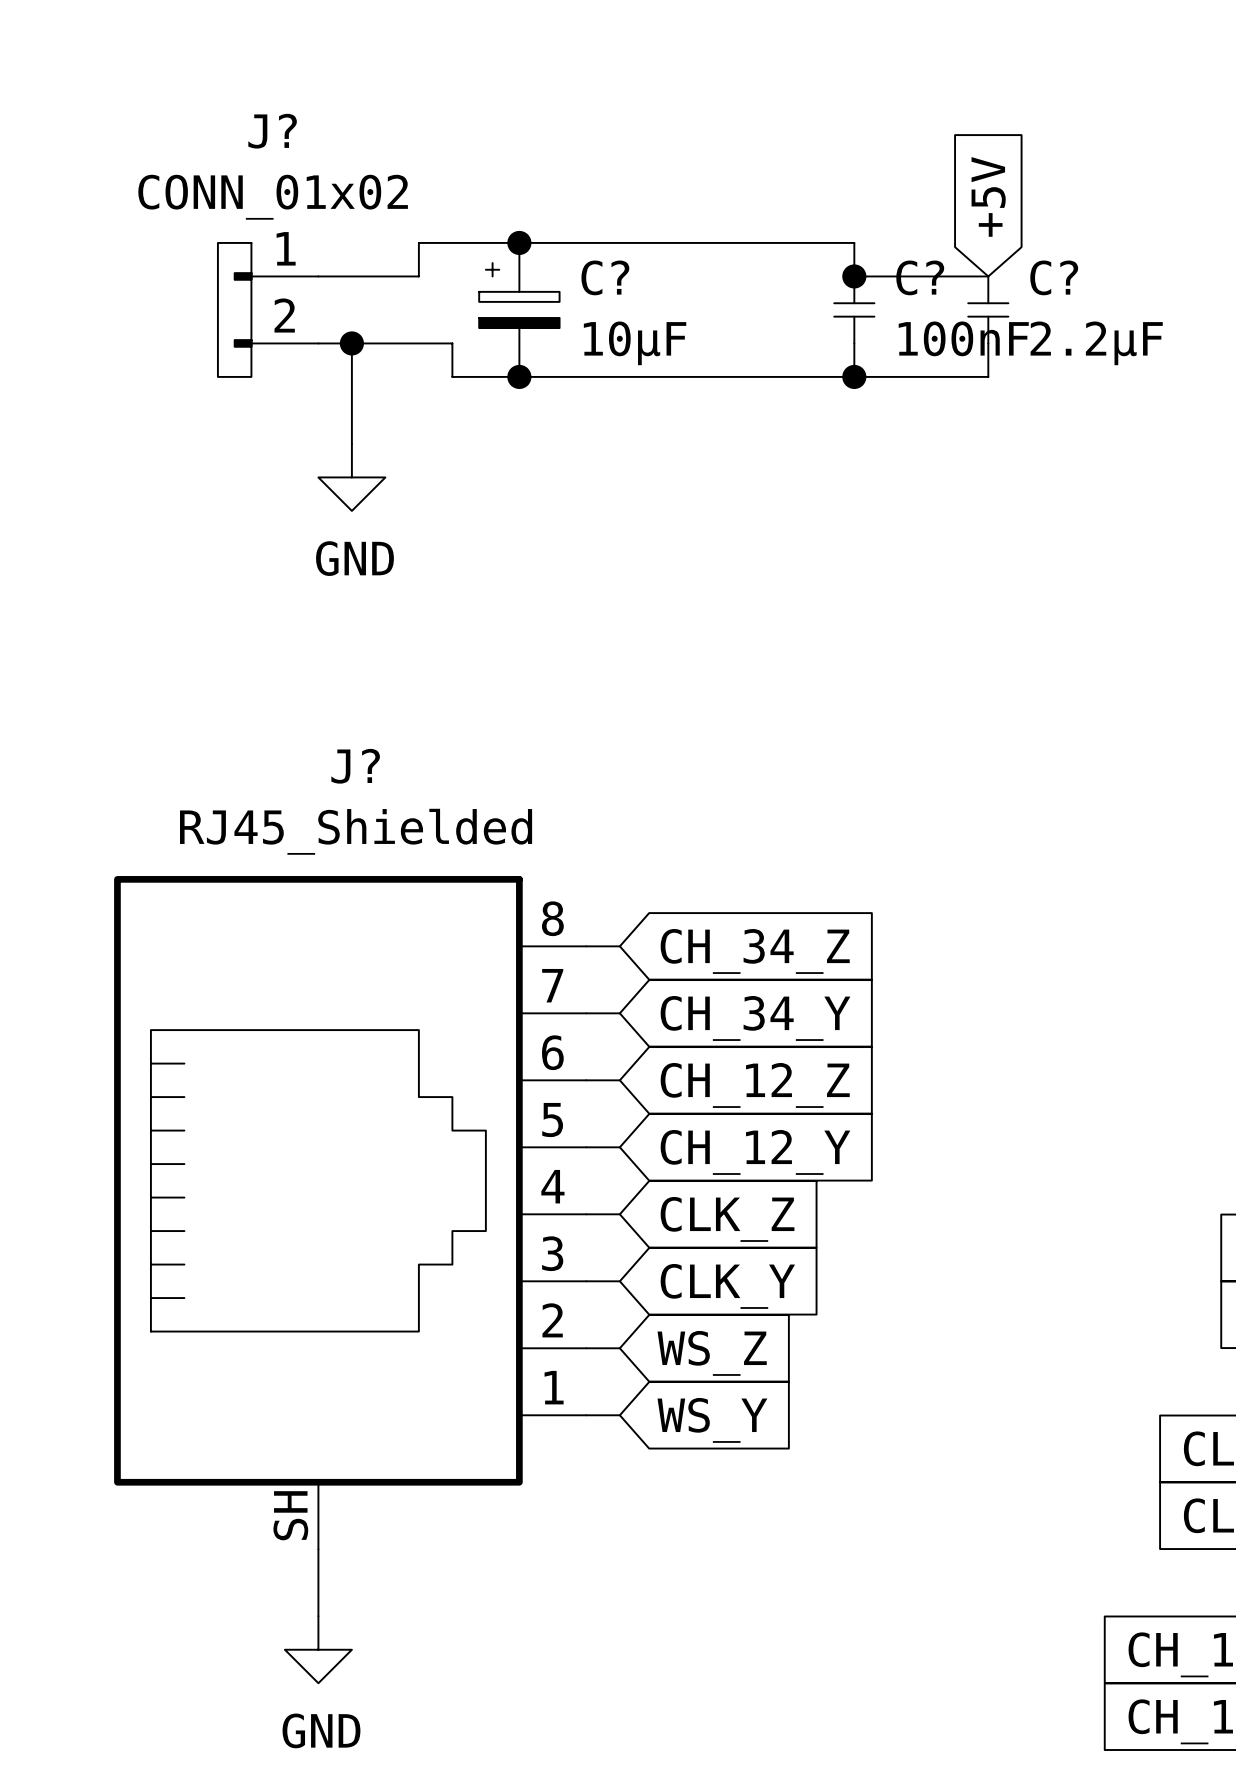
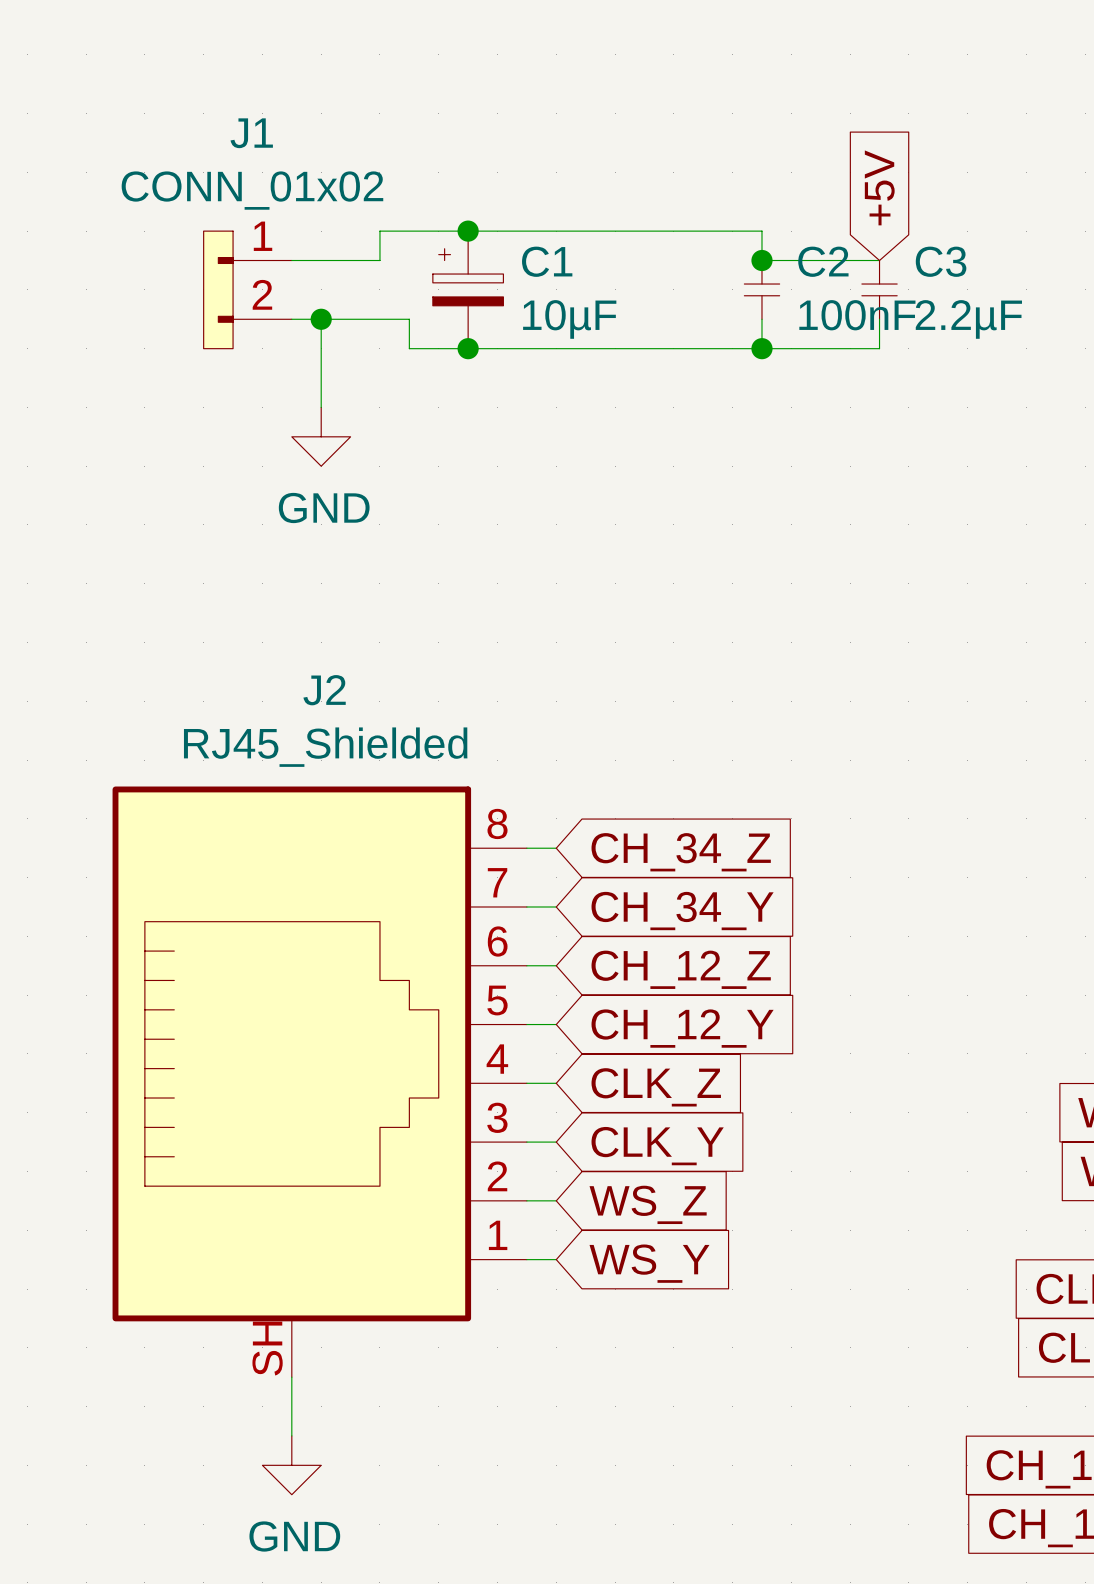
J? name: J? (272, 131) -> J1 (251, 133)
C? name: C? (605, 277) -> C1 (547, 261)
C? name: C? (920, 277) -> C2 (823, 261)
C? name: C? (1054, 277) -> C3 (941, 261)
J? name: J? (355, 766) -> J2 (324, 690)

